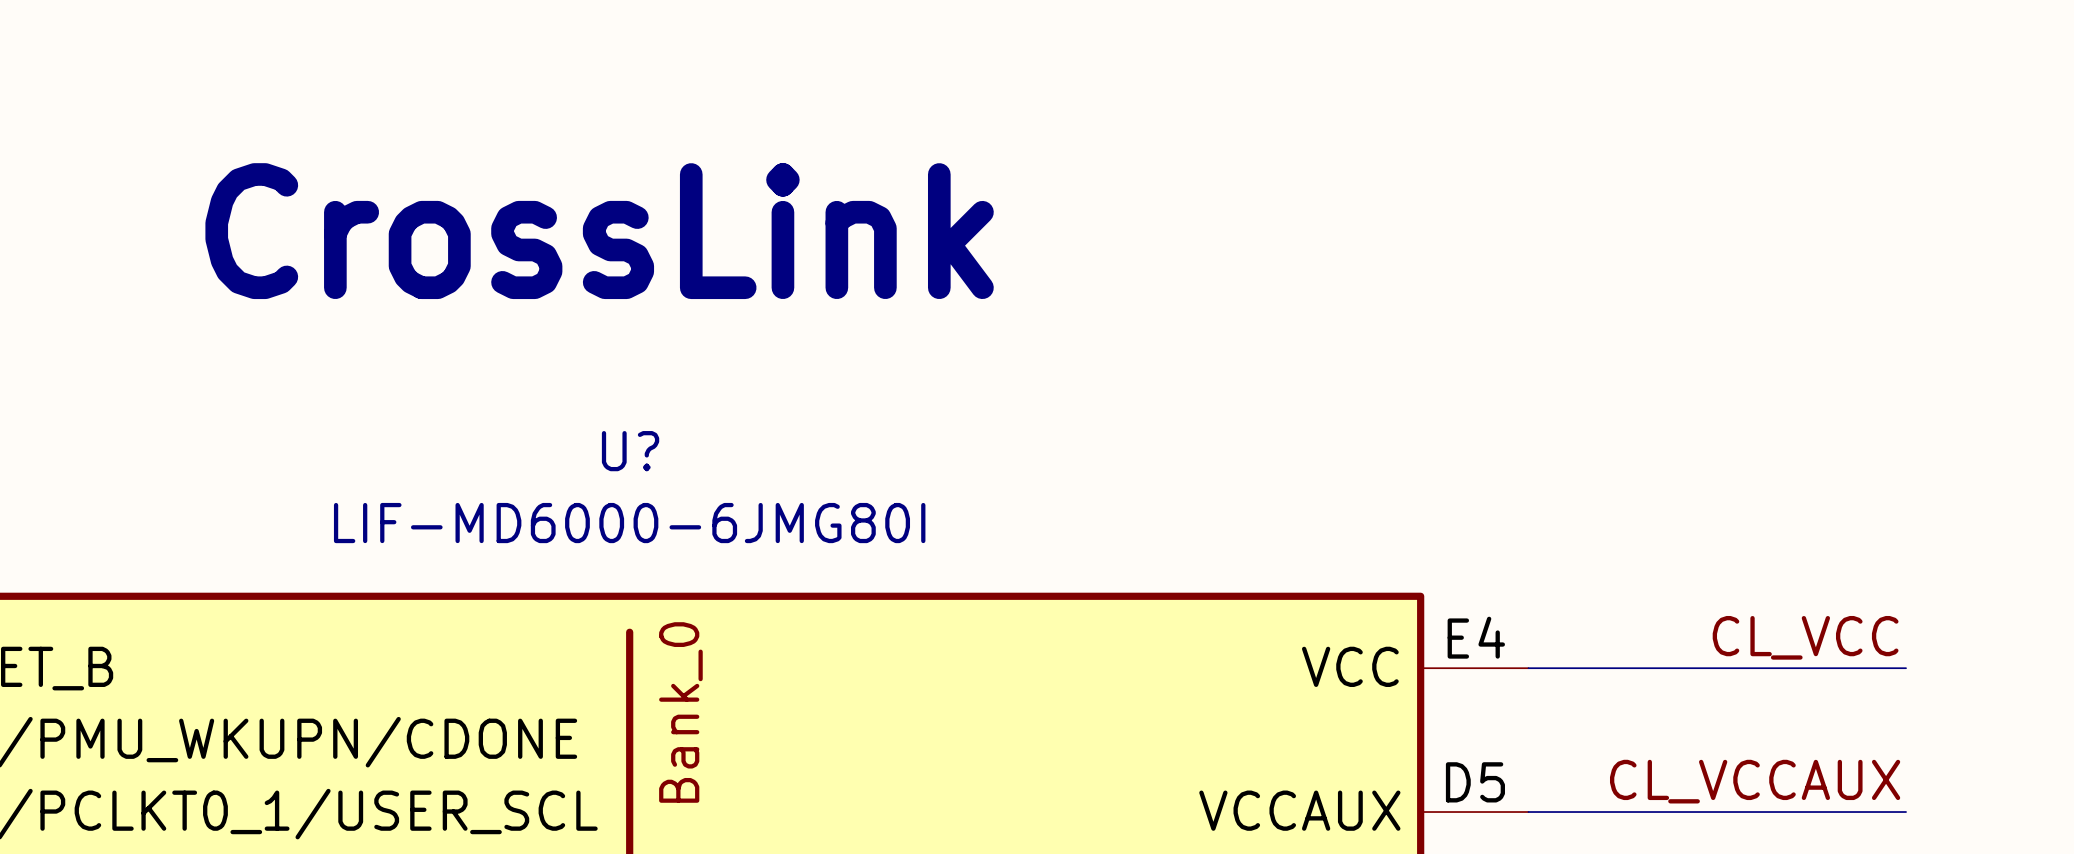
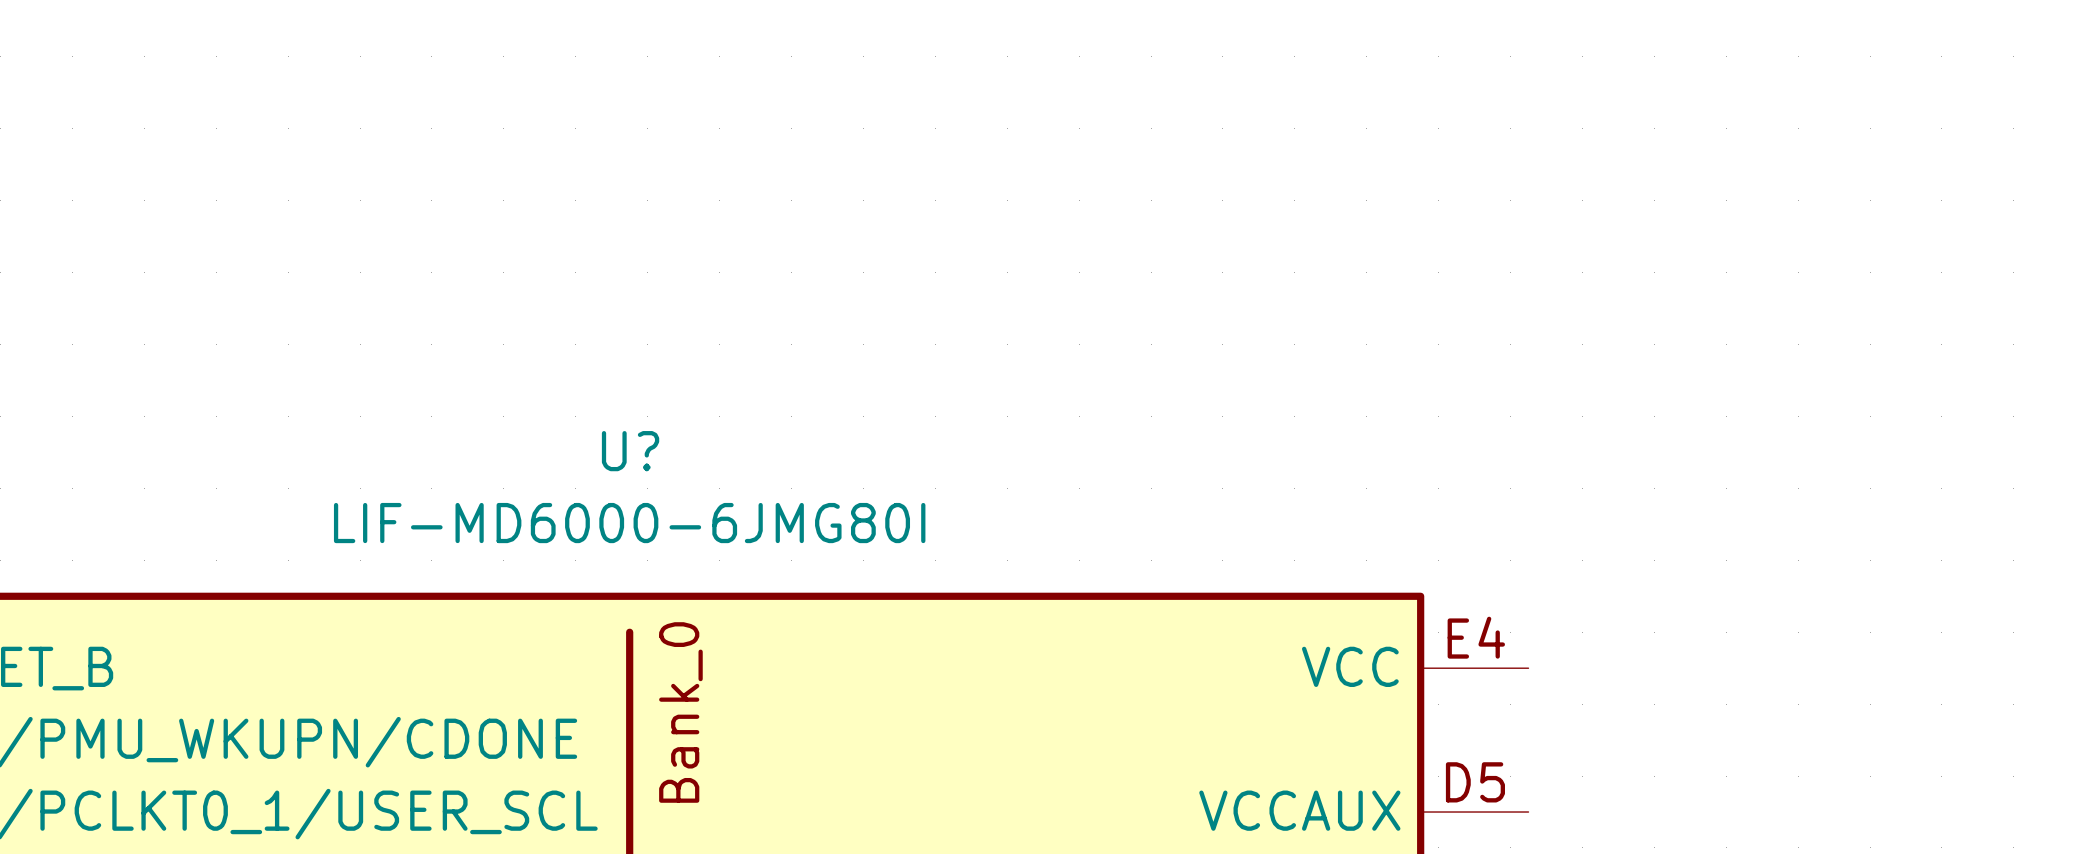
text: CrossLink (599, 231) -> none
label: CL_VCC (1805, 637) -> none
wire: (1528, 668) (1906, 668) -> none
label: CL_VCCAUX (1755, 781) -> none
wire: (1528, 812) (1906, 812) -> none

